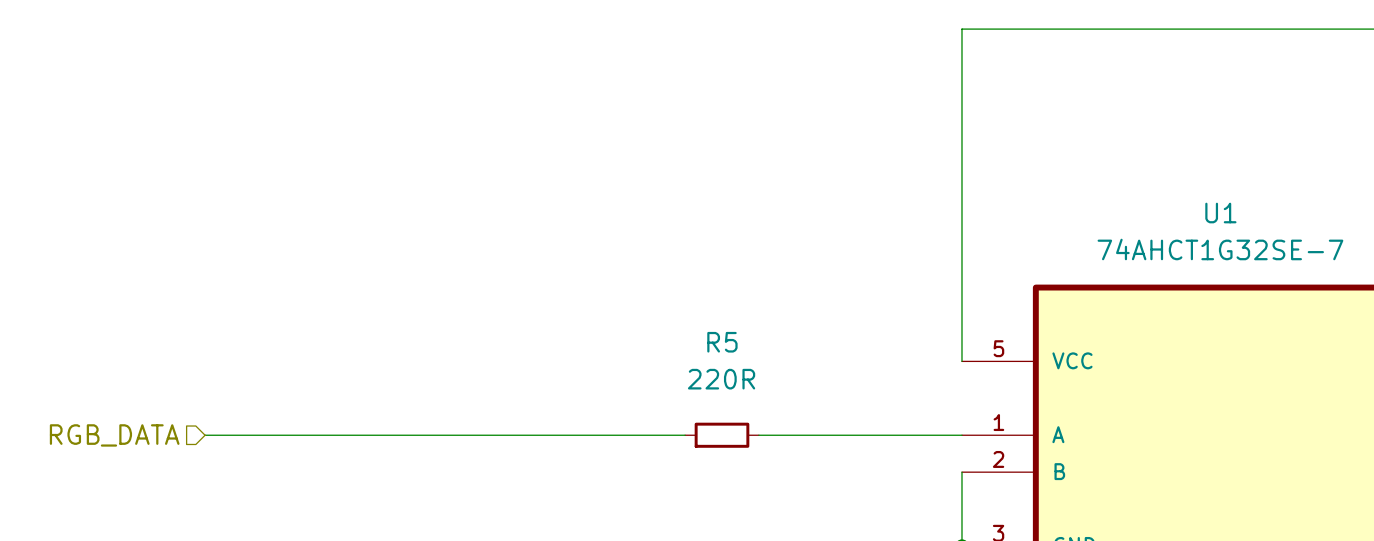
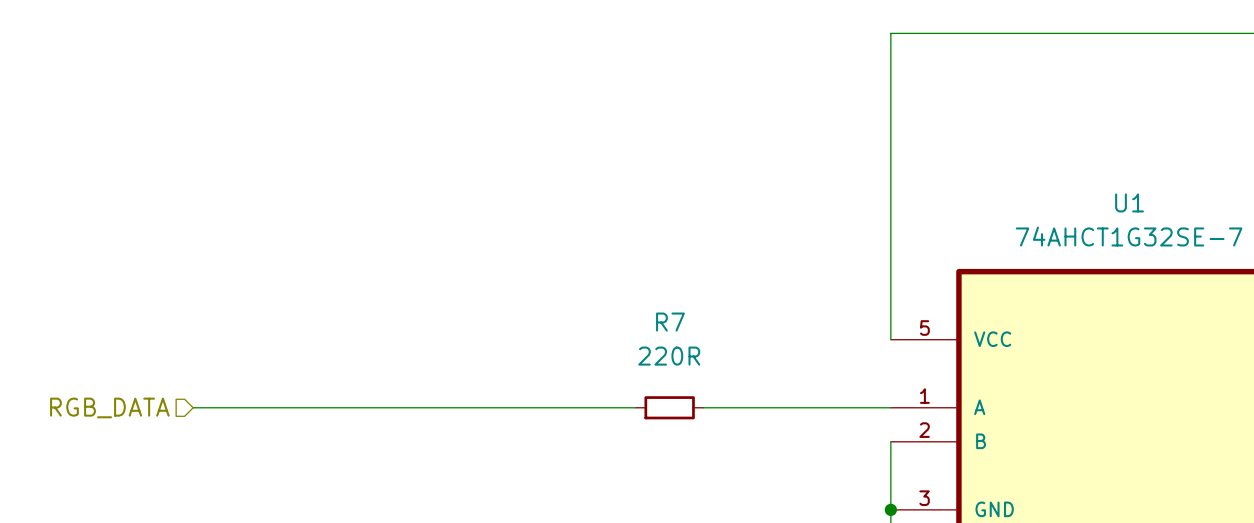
R5 name: R5 (722, 342) -> R7 (670, 322)

